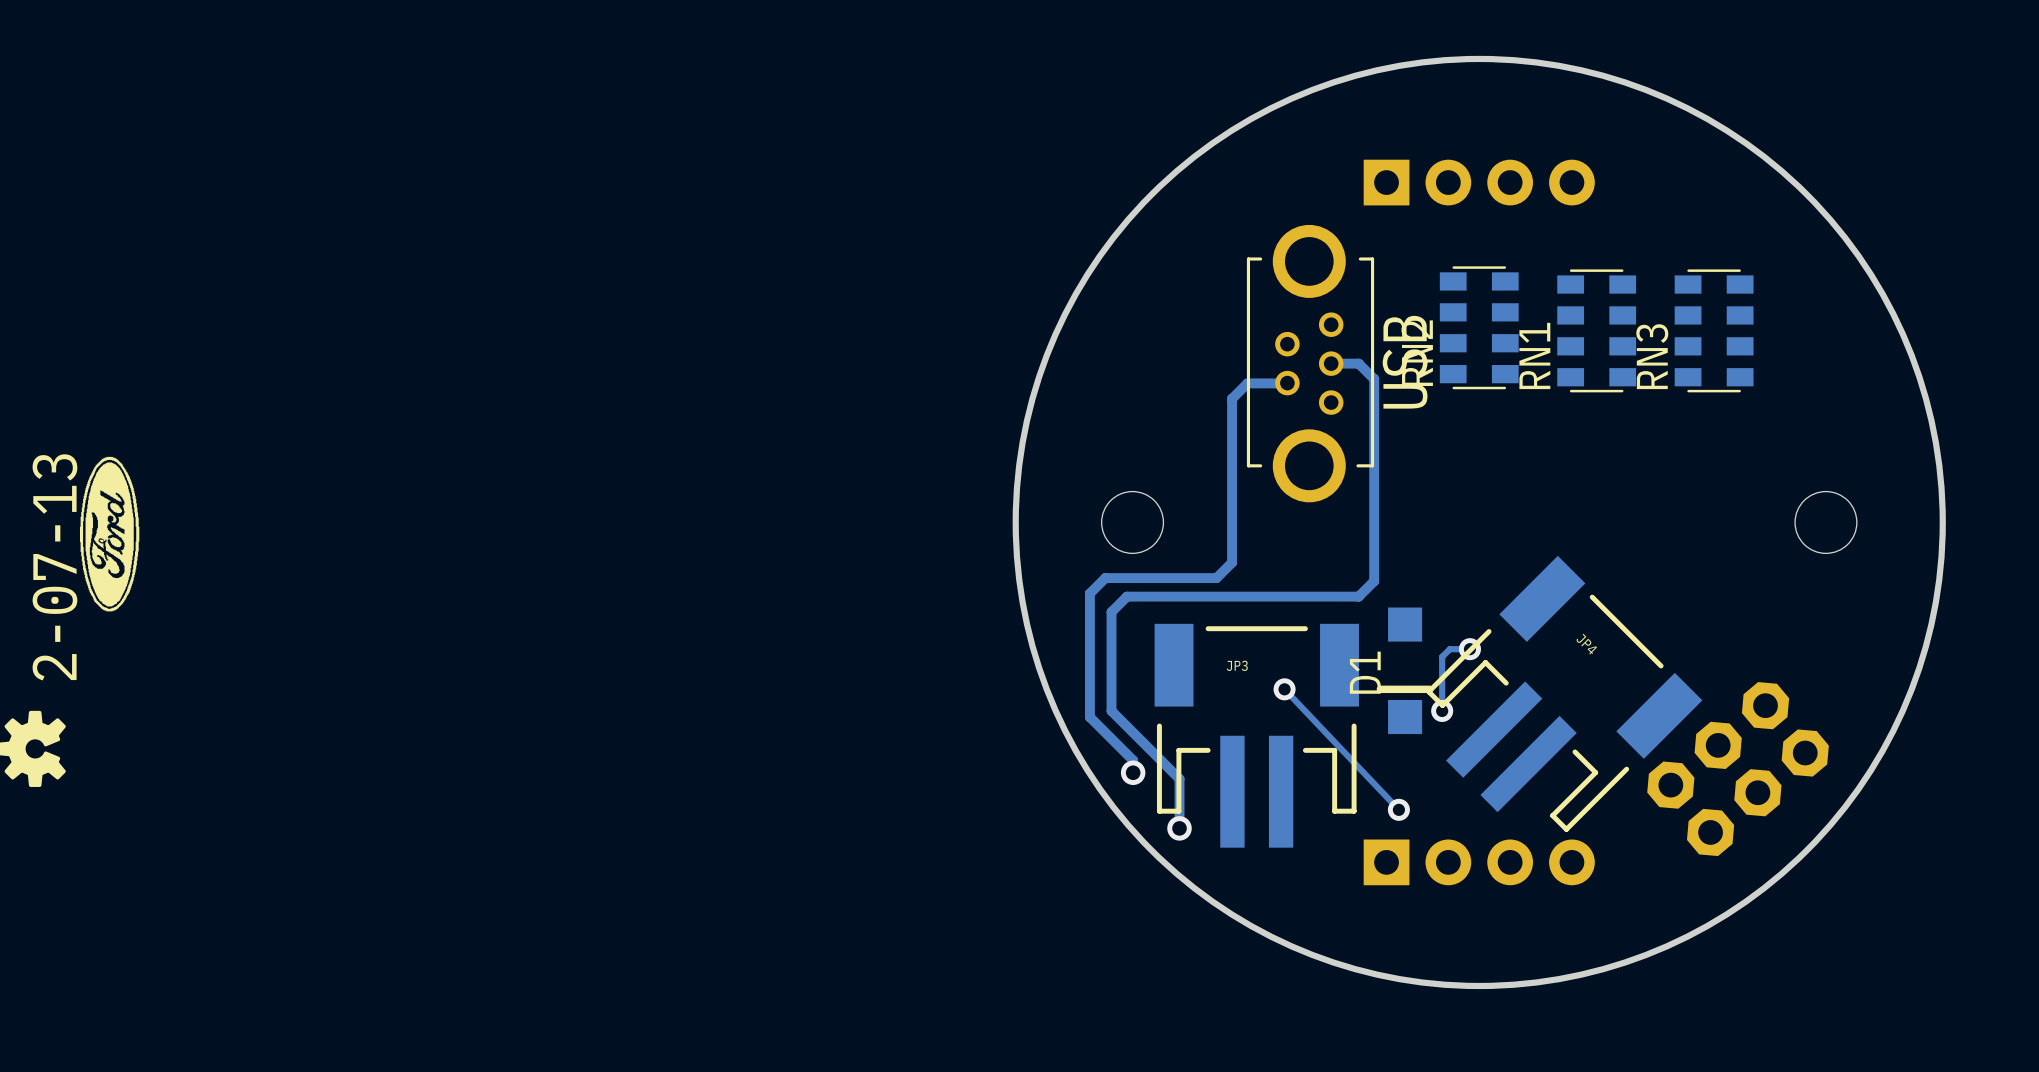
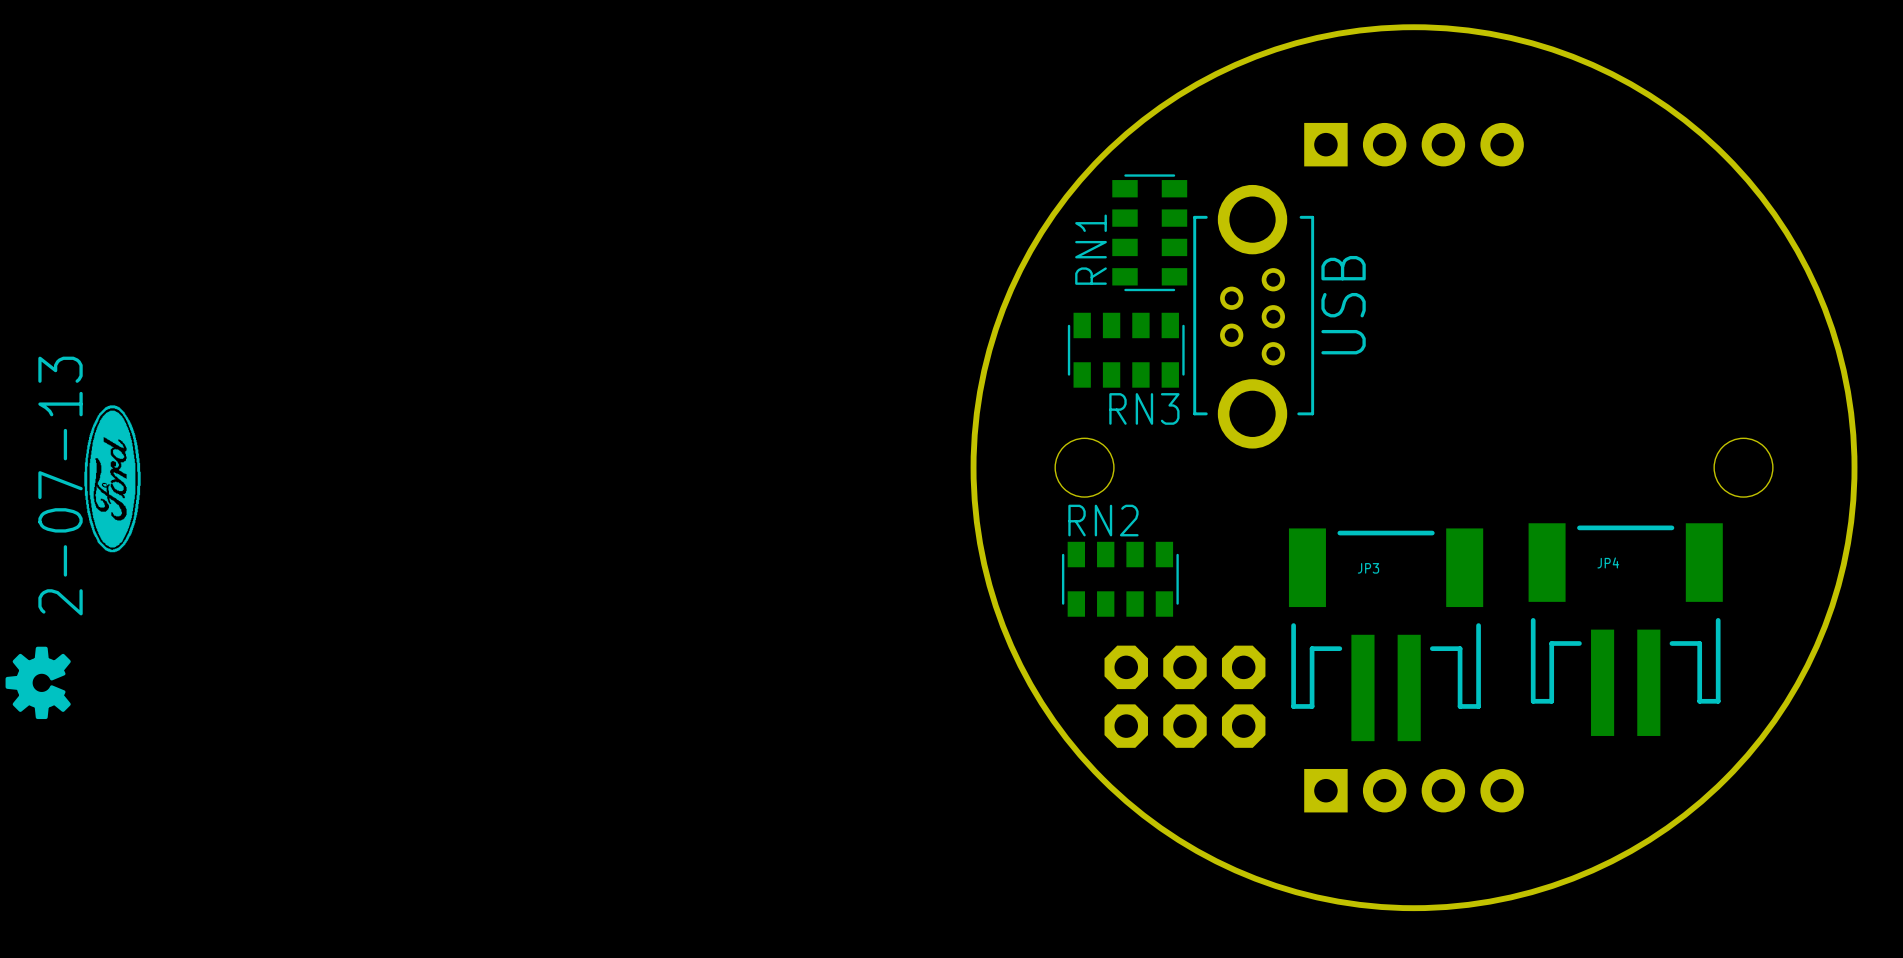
RN2 rotation: 0° (1479, 327) -> 90° clockwise (1120, 579)
RN2 position: (1479, 327) -> (1120, 579)
RN1 position: (1596, 330) -> (1149, 232)
RN3 rotation: 0° (1714, 330) -> 90° clockwise (1126, 350)
RN3 position: (1714, 330) -> (1126, 350)
RN3 name position: RN3 (1652, 356) -> RN3 (1144, 408)
track: (1331, 363) (1358, 363) (1374, 379) (1374, 581) (1358, 596) (1126, 596) (1111, 612) (1111, 710) (1179, 778) (1179, 828) -> none
track: (1287, 383) (1247, 383) (1232, 398) (1232, 562) (1216, 578) (1105, 578) (1089, 593) (1089, 717) (1133, 760) (1133, 772) -> none
track: (1469, 649) (1449, 649) (1442, 656) (1442, 710) -> none
via: (1469, 649) -> none
D1: (1405, 670) -> none
track: (1284, 689) (1398, 809) -> none
via: (1284, 689) -> none
JP4 rotation: 0° (1564, 693) -> 45° counterclockwise (1625, 629)
via: (1442, 710) -> none
JP3 position: (1256, 735) -> (1386, 634)
part: none -> (1184, 696)
part: (1738, 769) -> none
via: (1133, 772) -> none
via: (1398, 809) -> none
via: (1179, 828) -> none

